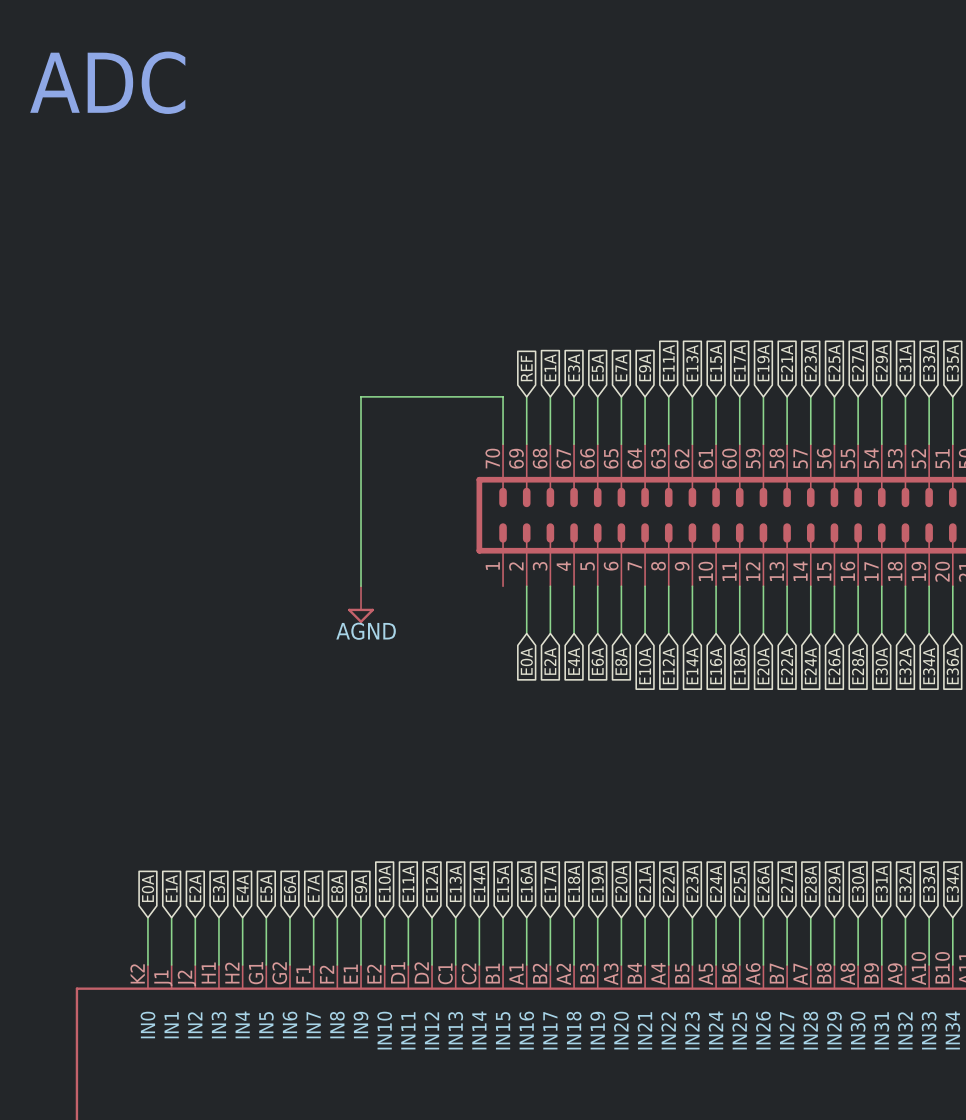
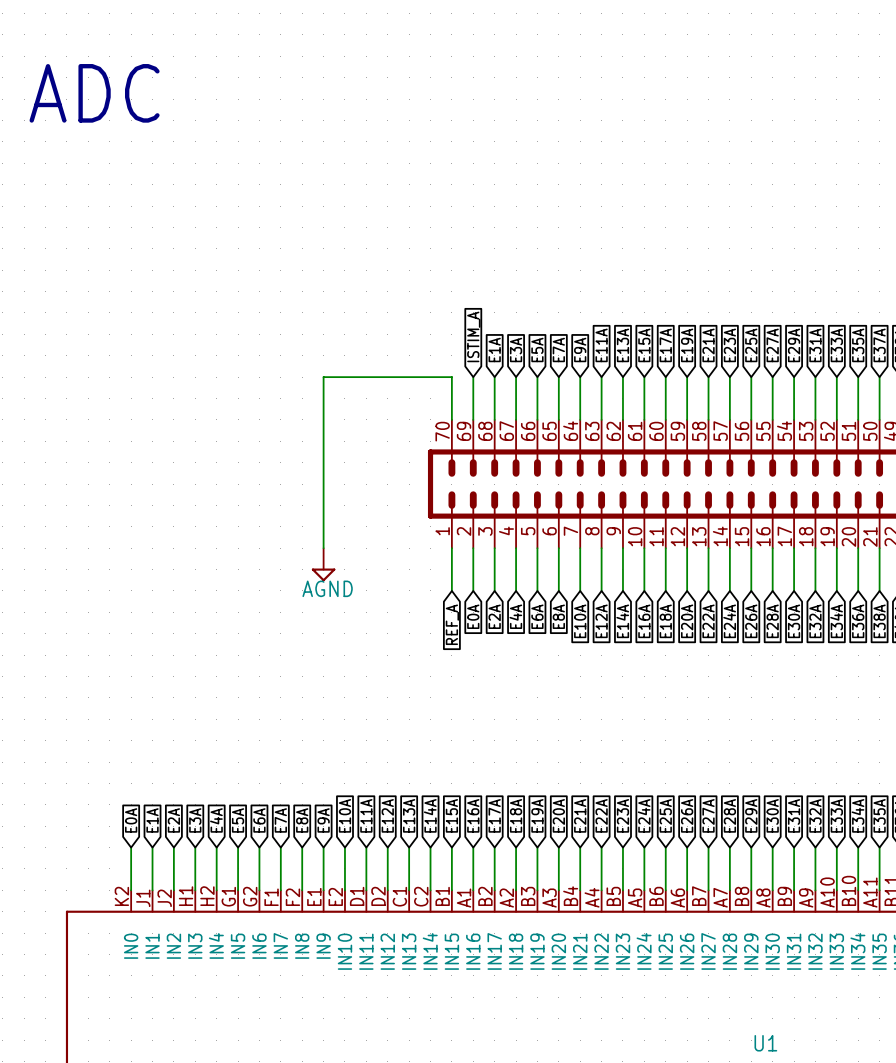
global label: REF (526, 368) -> ISTIM_A (473, 336)
wire: none -> (451, 548) (451, 590)
global label: none -> REF_A (452, 624)

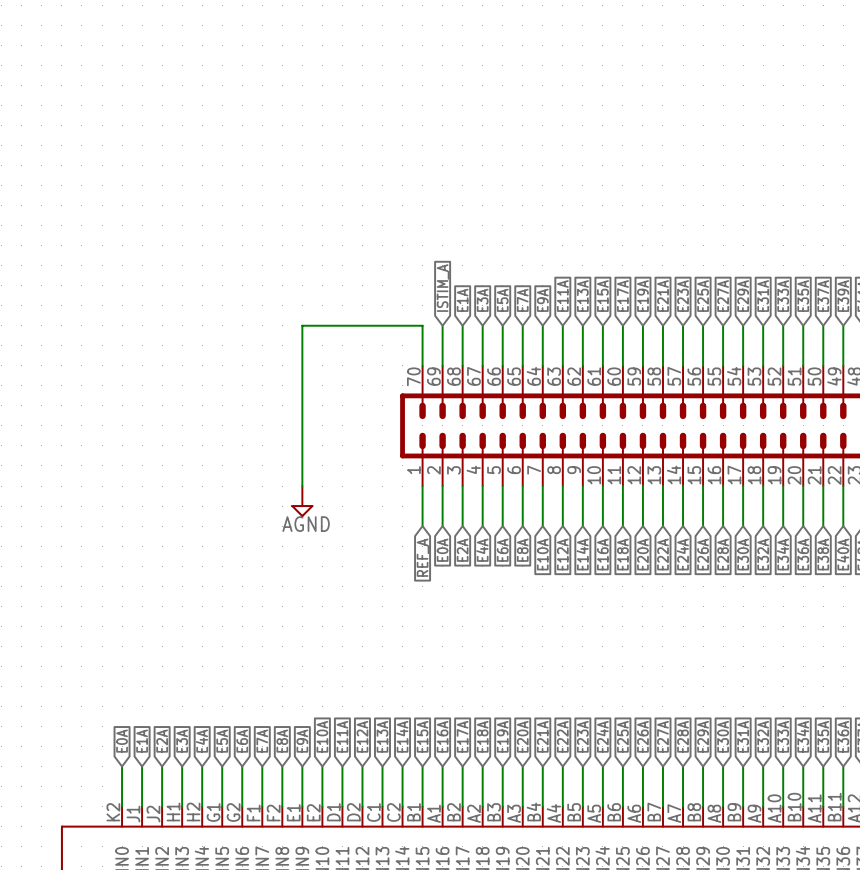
text: ADC (94, 93) -> none

